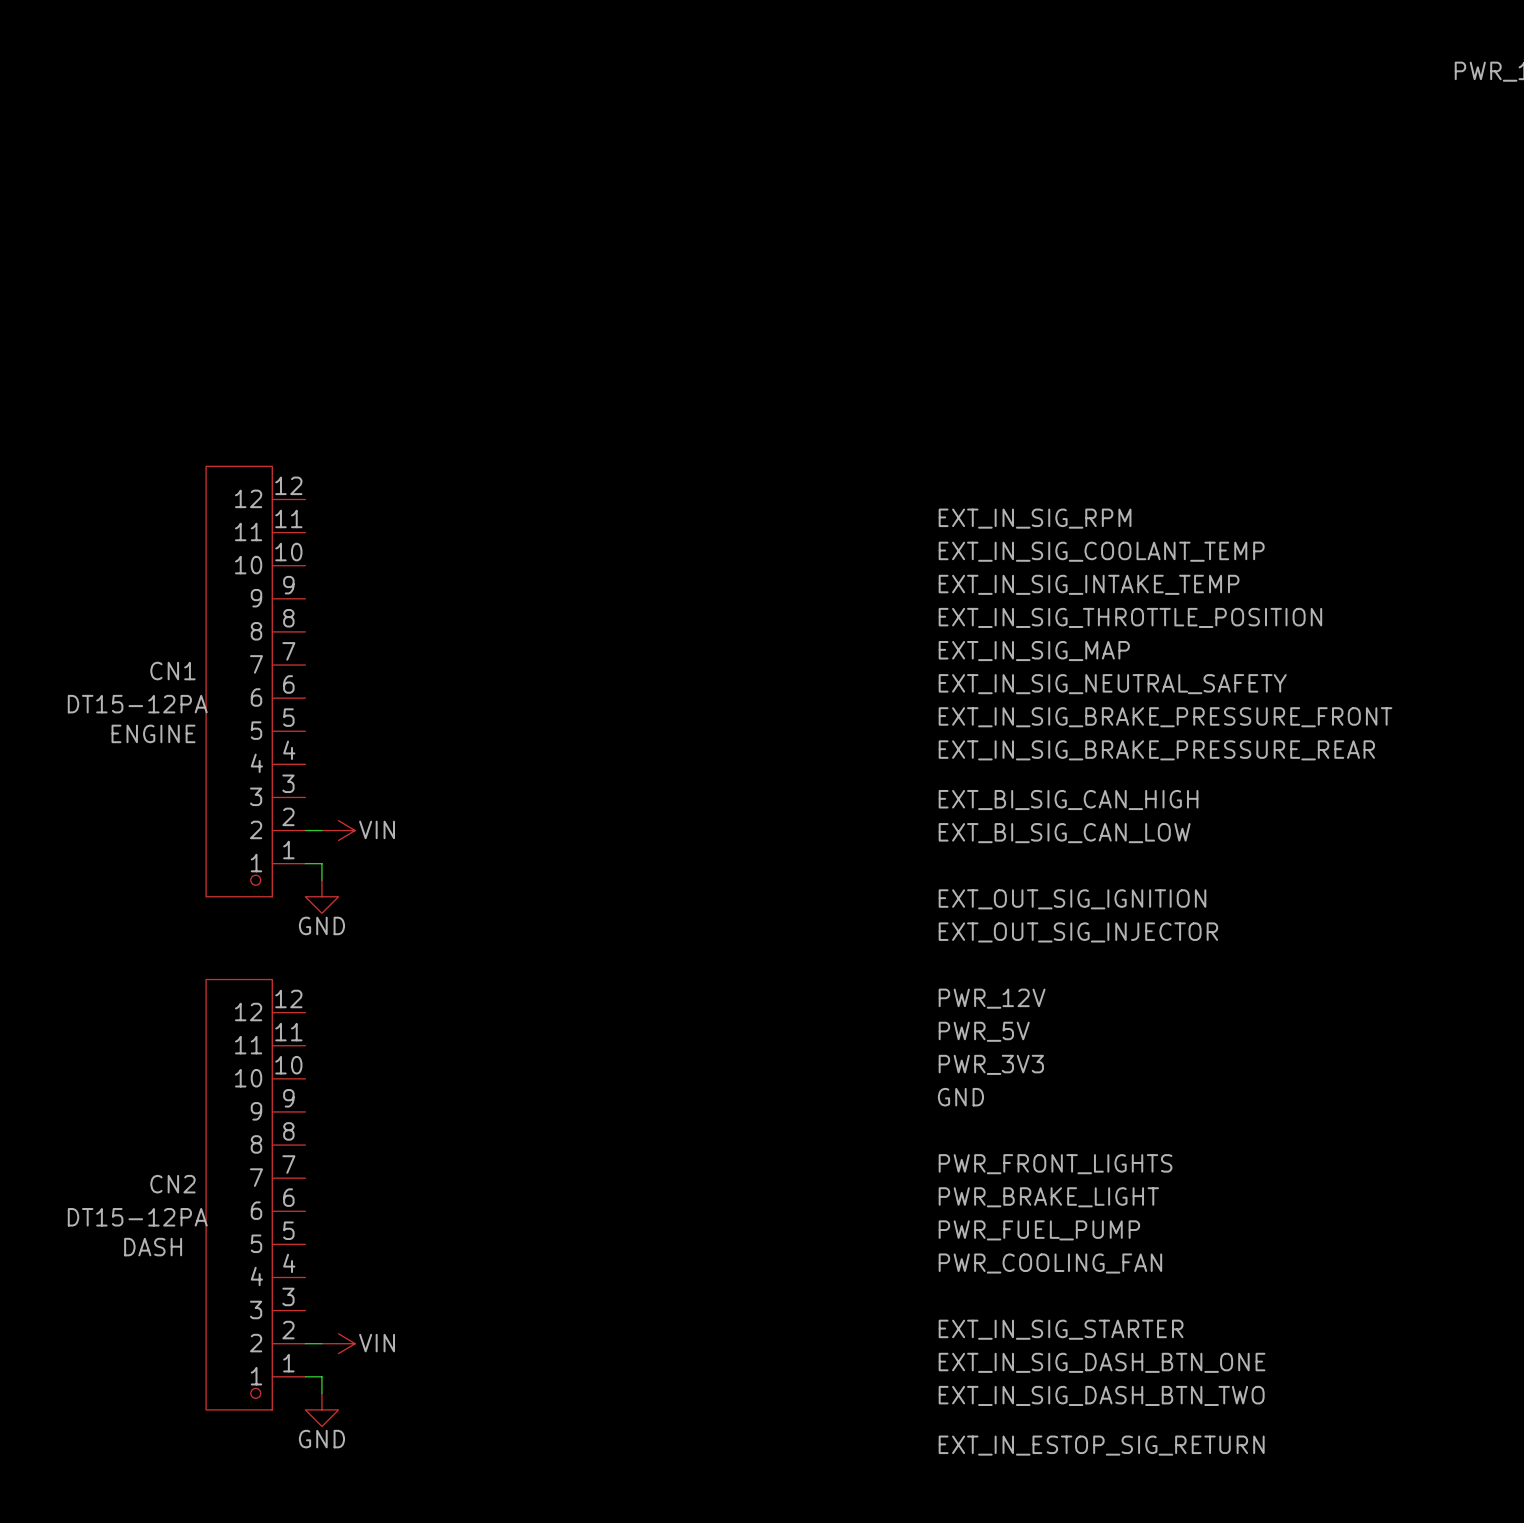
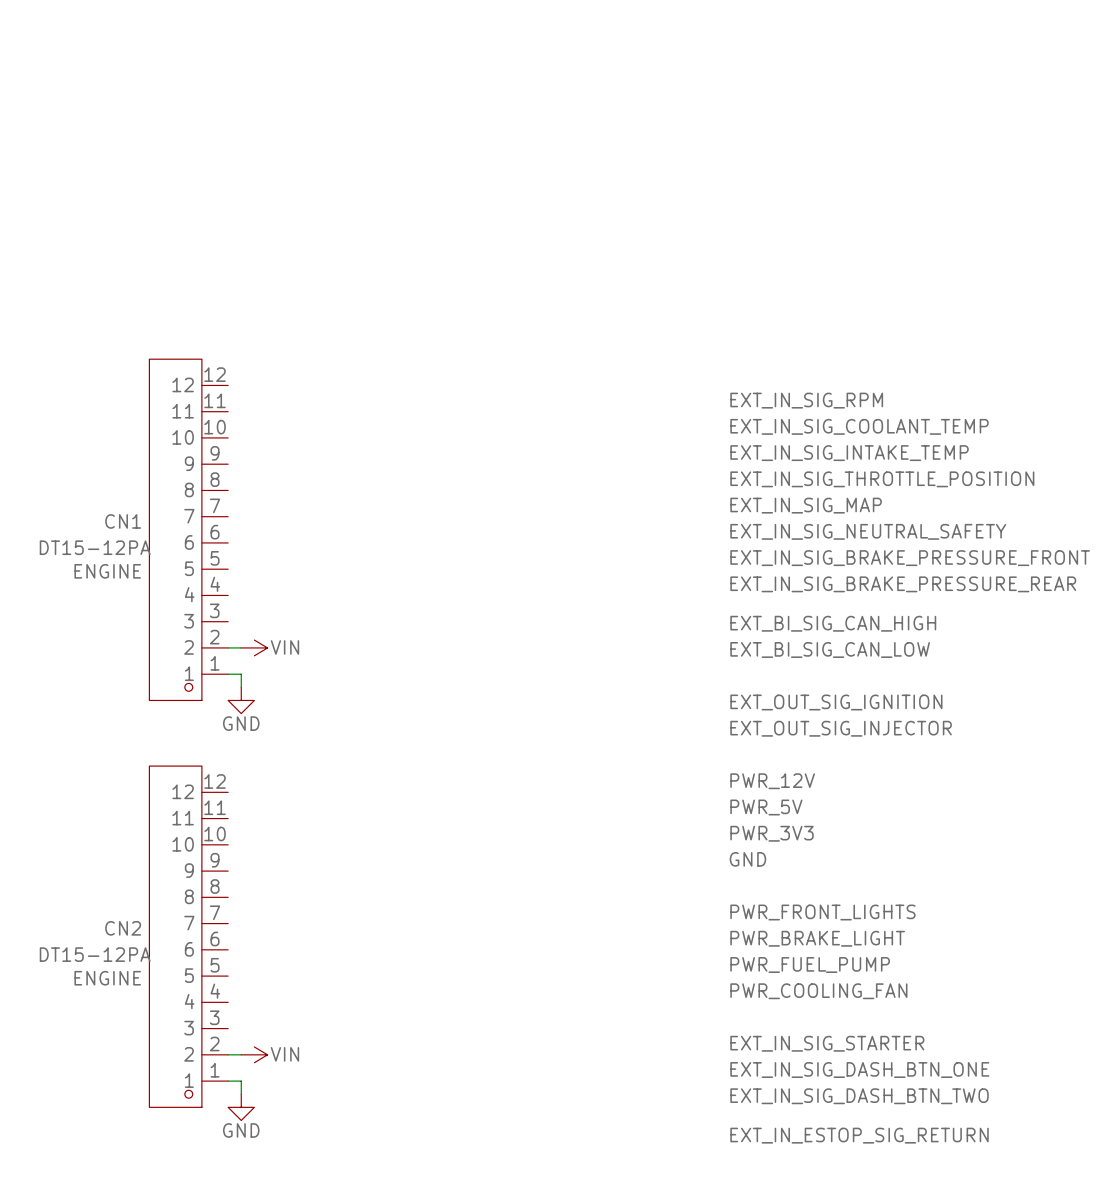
CN2 text: DASH (153, 1247) -> ENGINE (107, 978)

